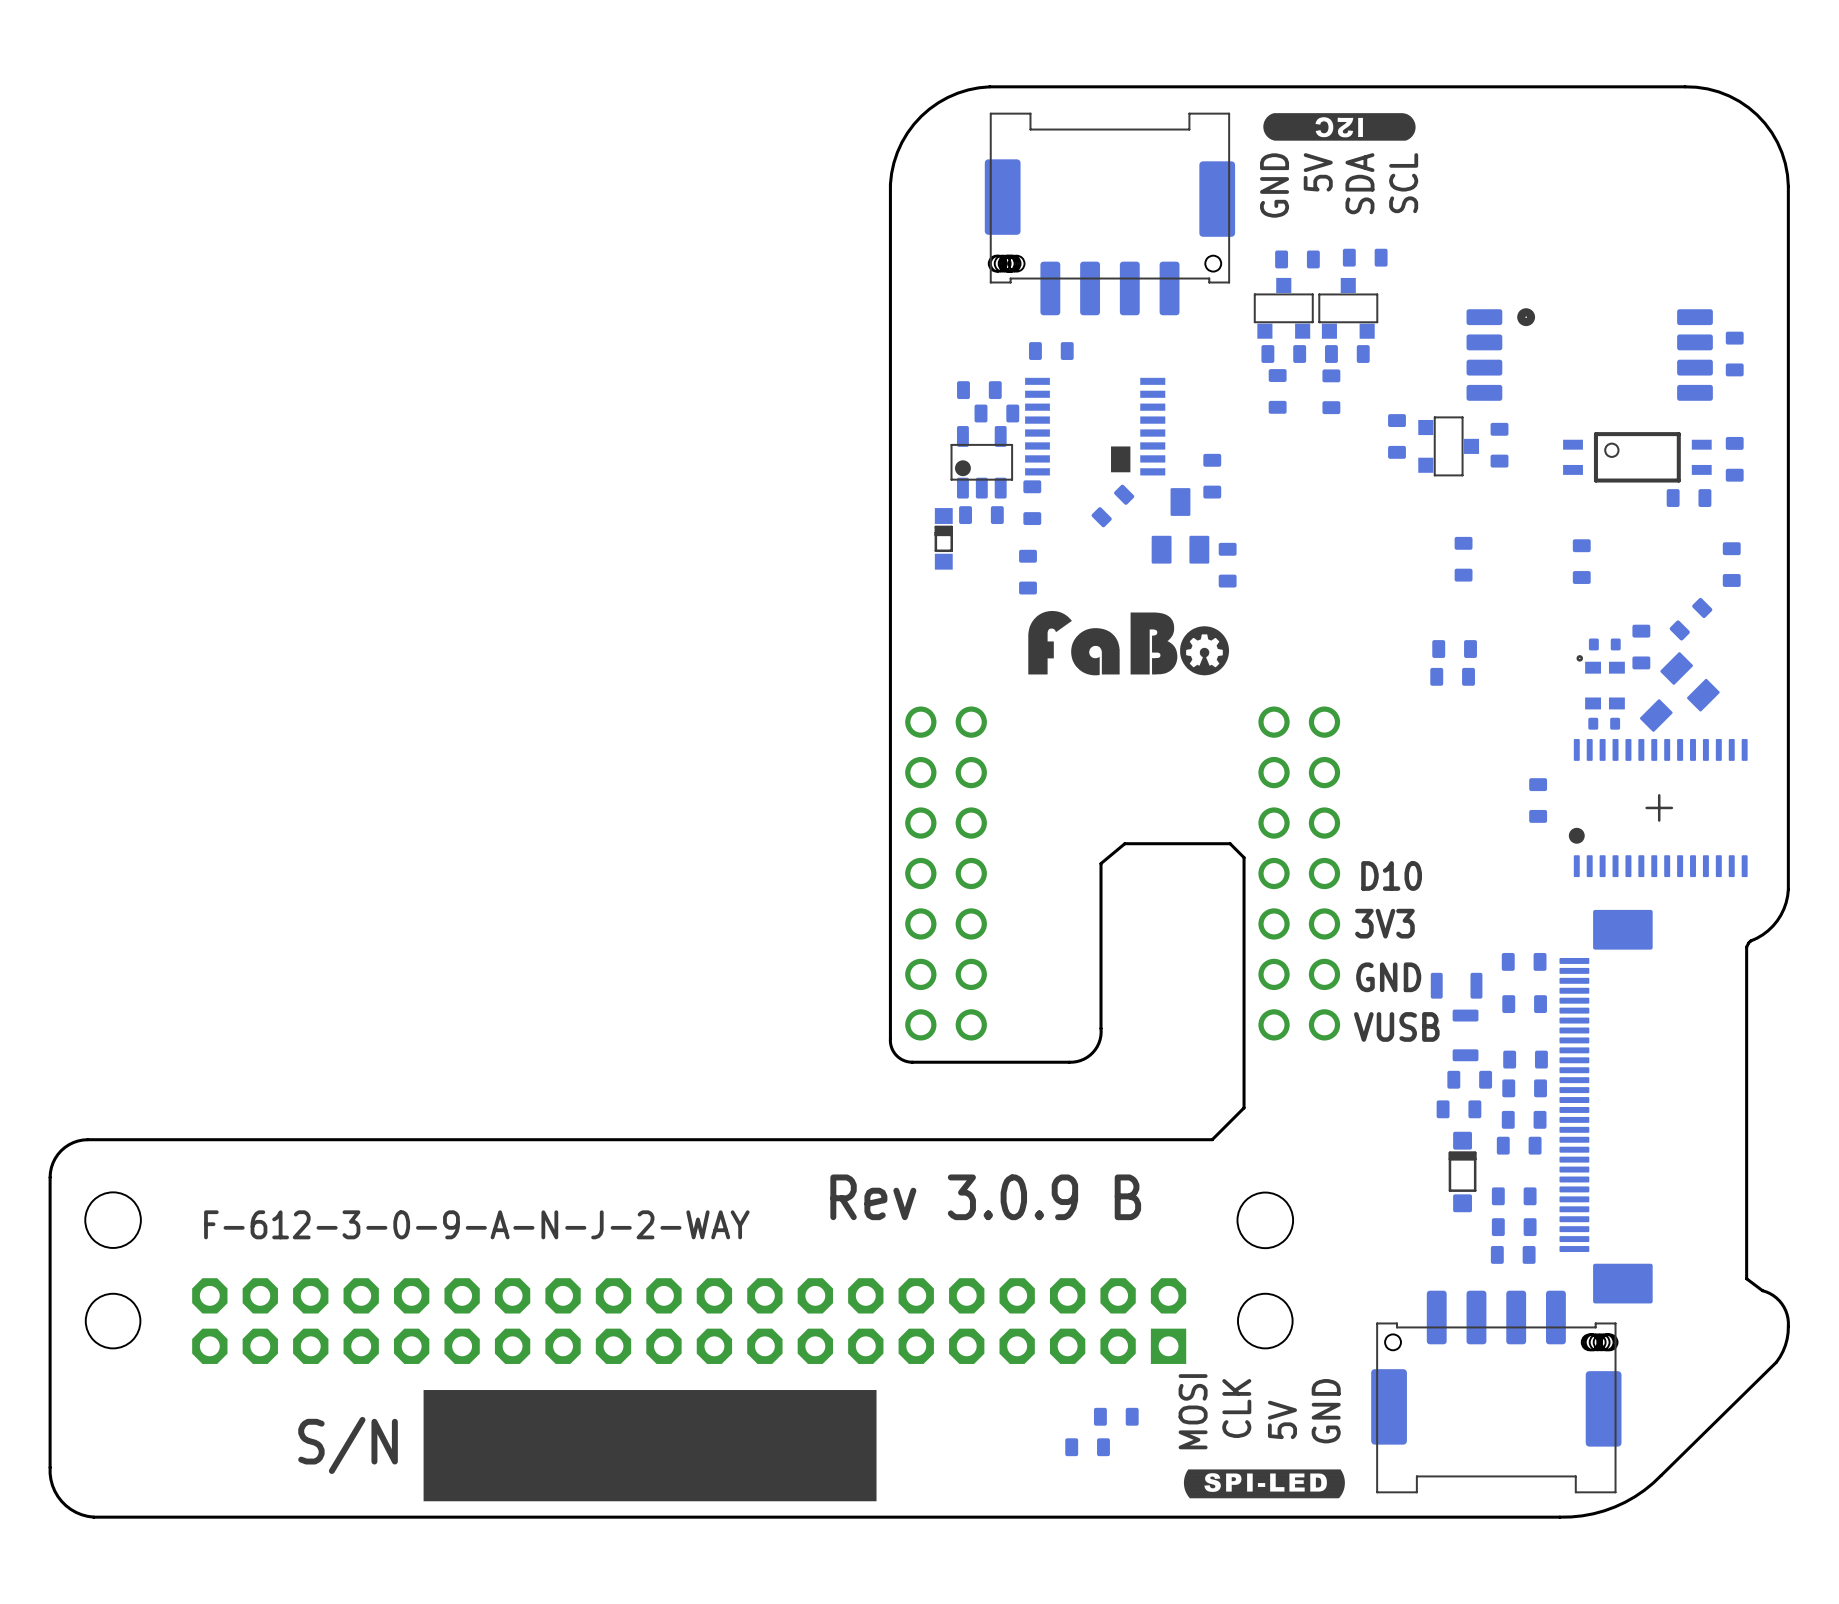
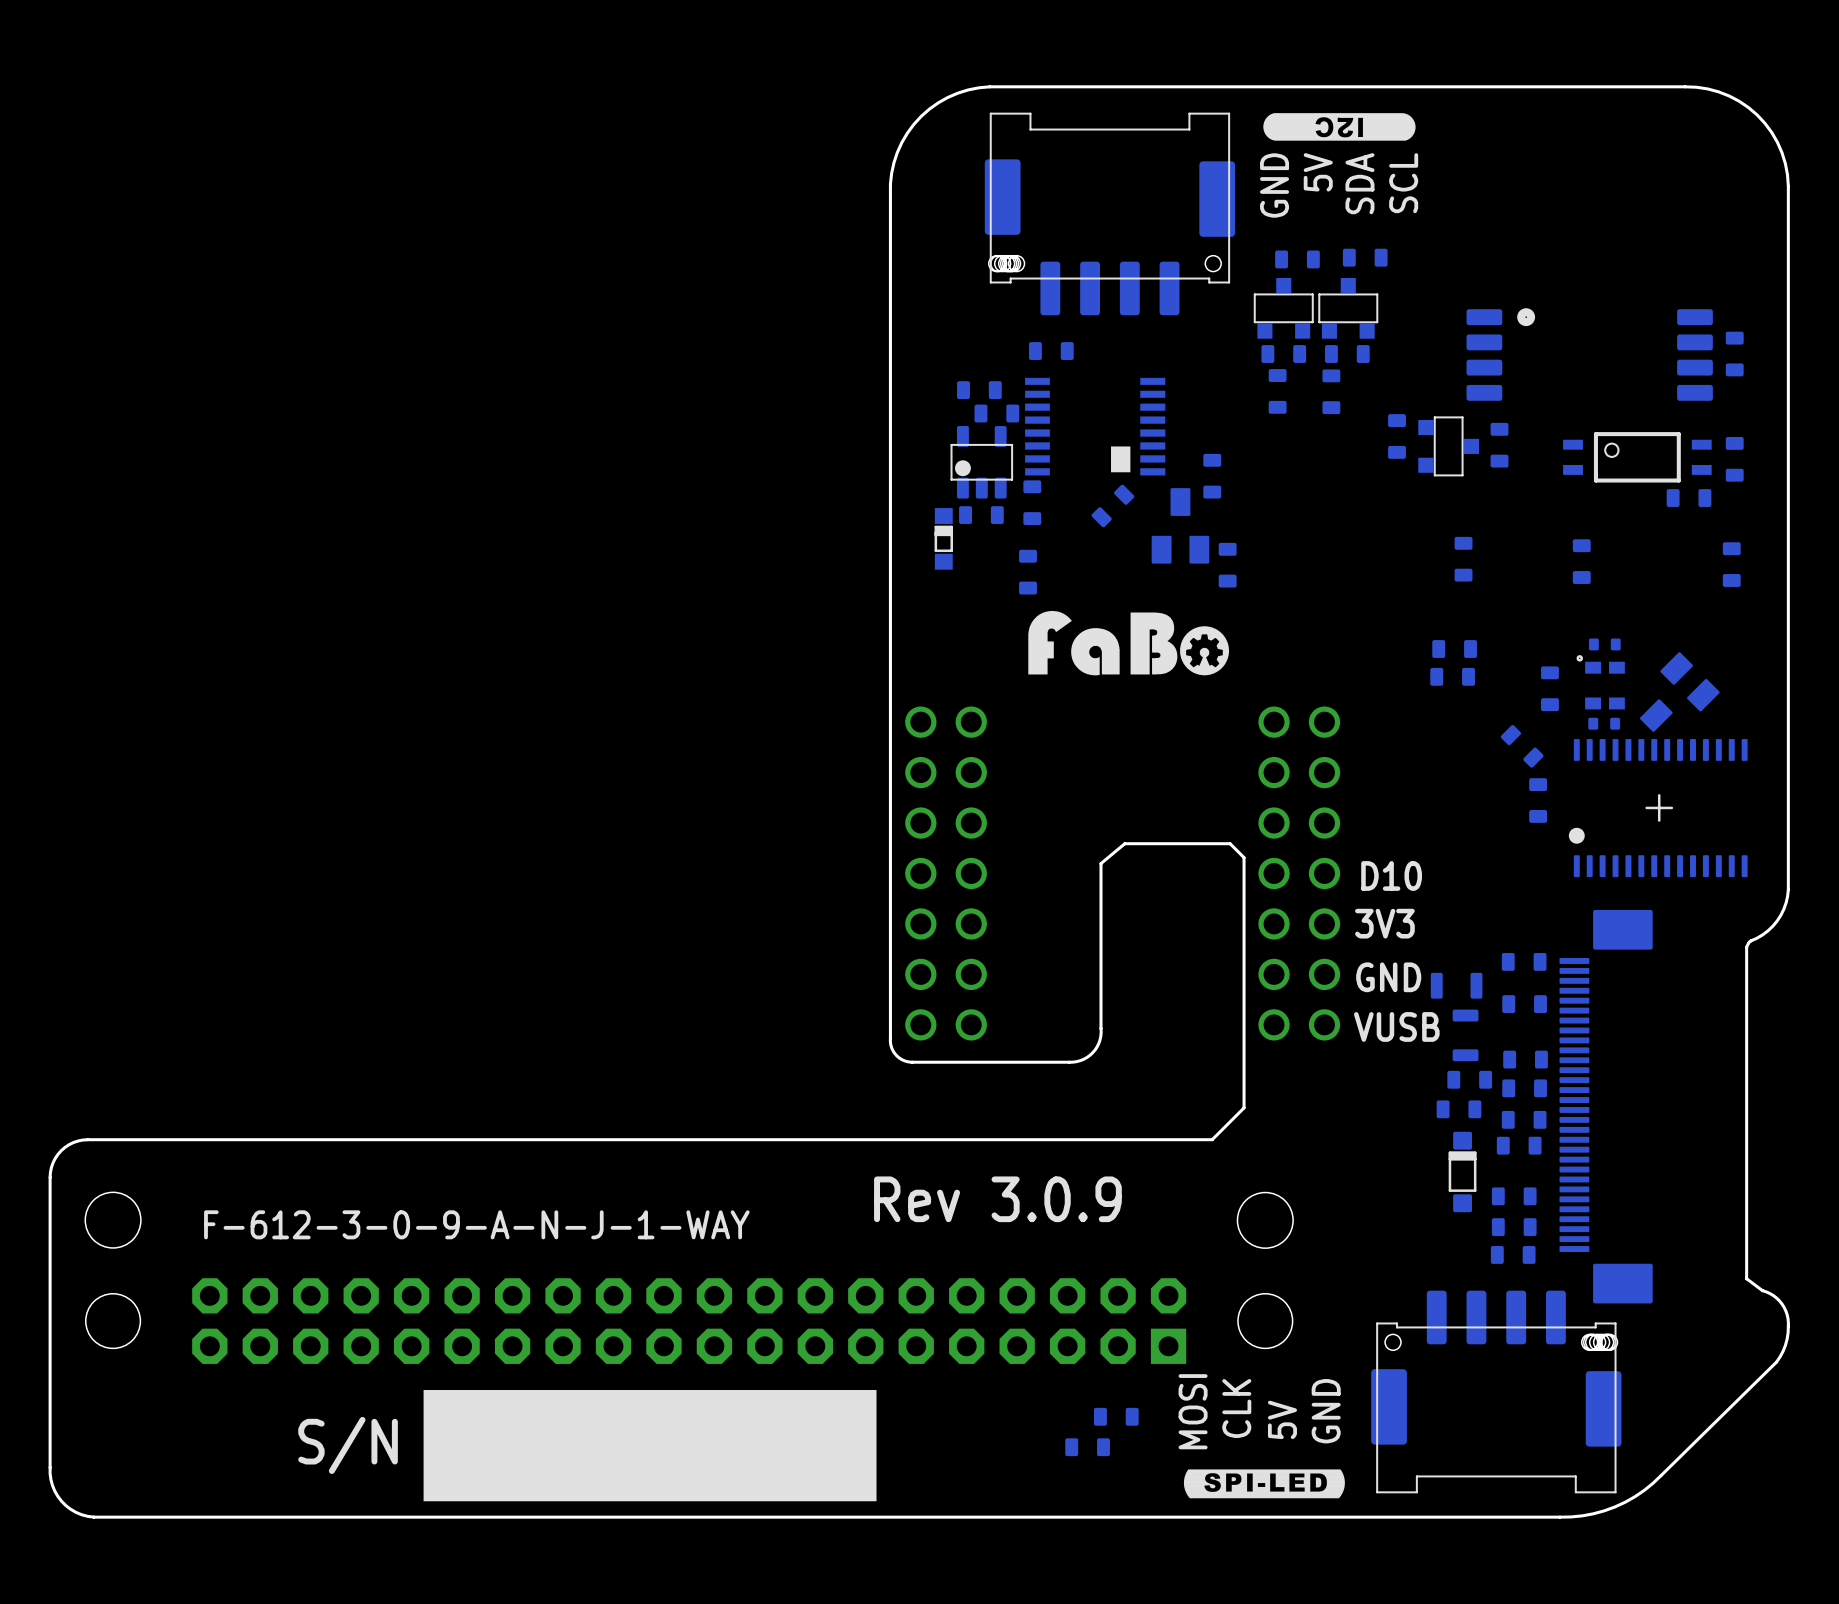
part rotation: 0° (1691, 619) -> 90° clockwise (1522, 746)
part position: (1691, 619) -> (1522, 746)
part position: (1641, 647) -> (1549, 688)
text: Rev 3.0.9 B (985, 1197) -> Rev 3.0.9 (997, 1199)
text: F-612-3-0-9-A-N-J-2-WAY (476, 1224) -> F-612-3-0-9-A-N-J-1-WAY (476, 1224)

